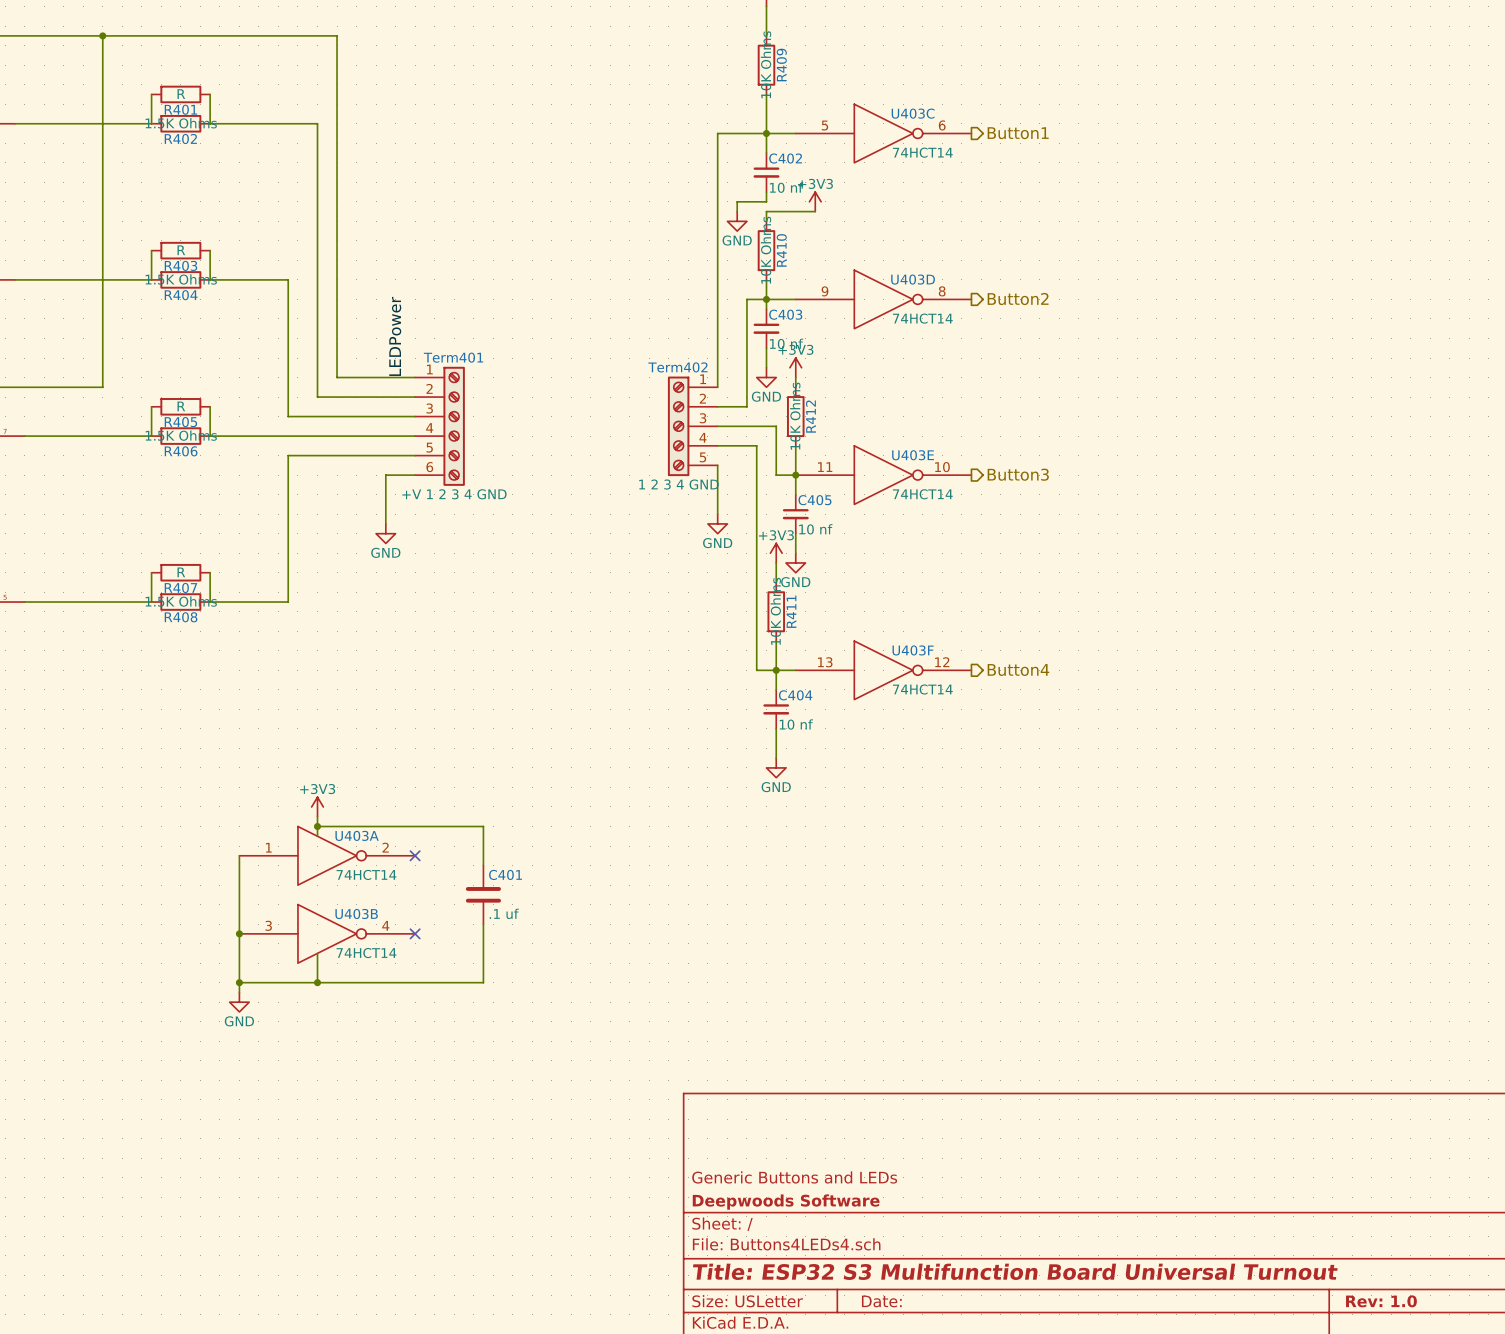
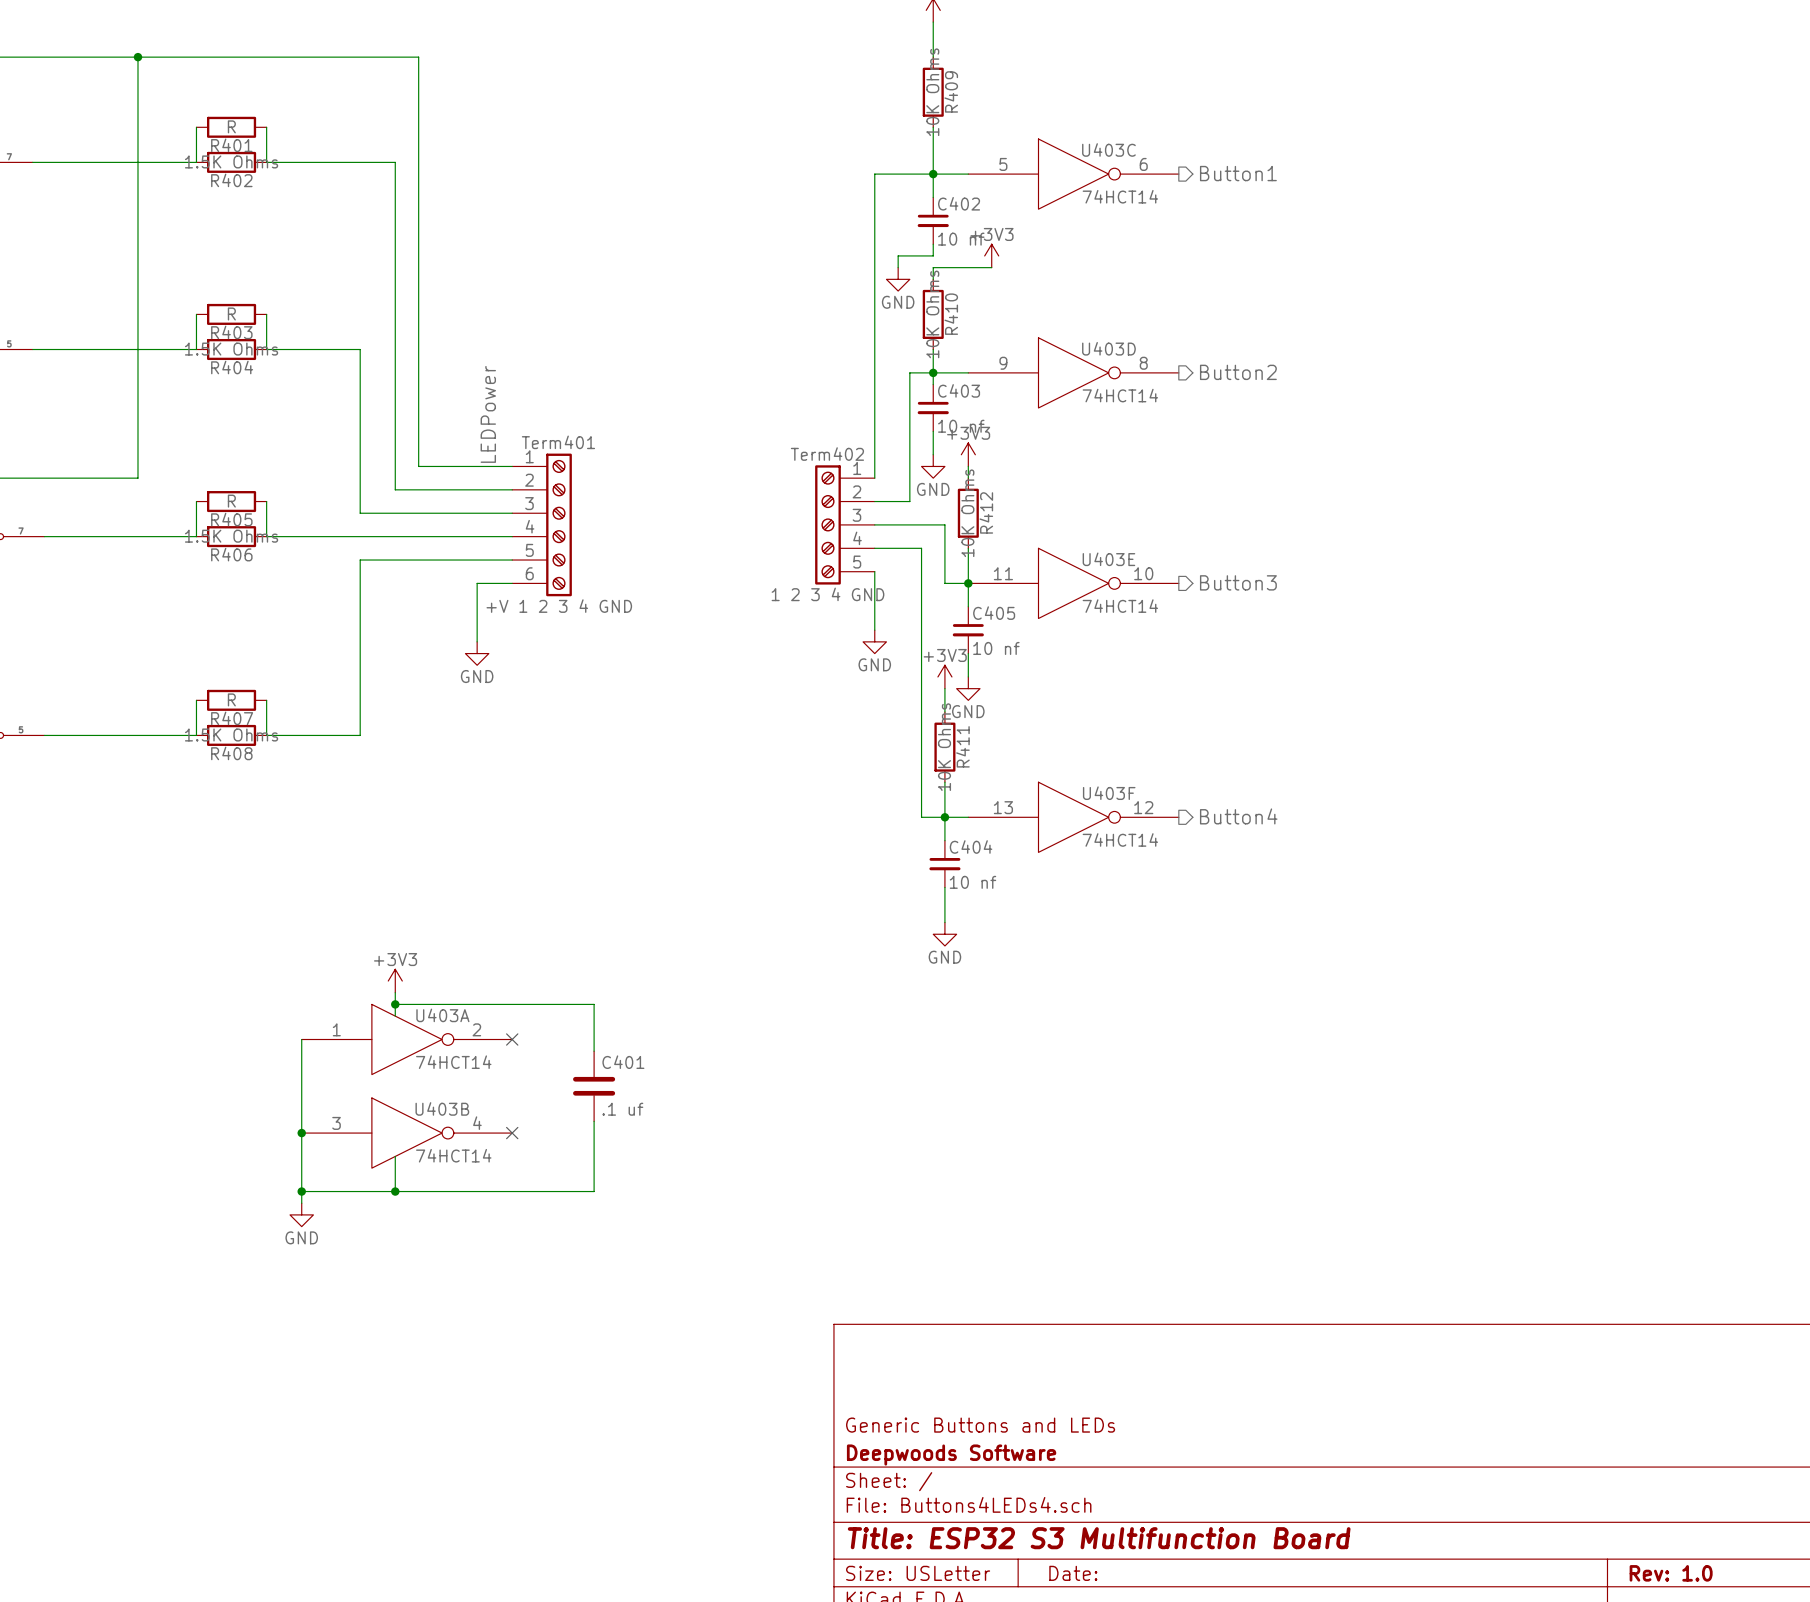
title block: Title: ESP32 S3 Multifunction Board Universal Turnout (1015, 1271) -> Title: ESP32 S3 Multifunction Board (1099, 1538)

